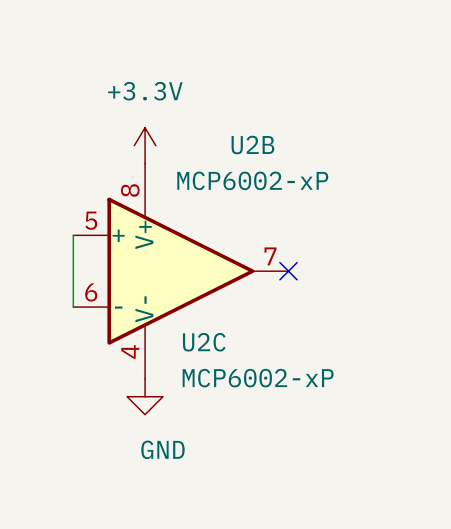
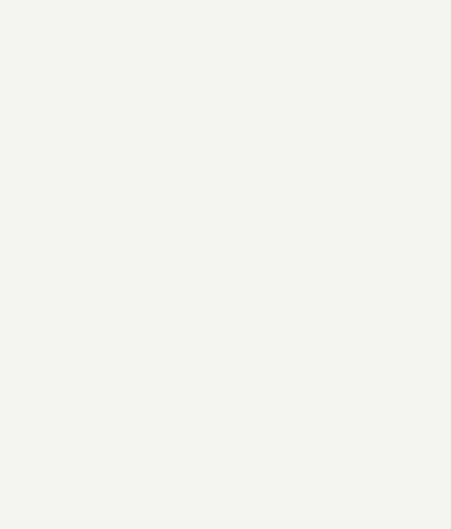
power symbol: +3.3V (145, 145) -> none
wire: (73, 235) (73, 307) -> none
U2C: MCP6002-xP (145, 271) -> none
U2B: MCP6002-xP (180, 271) -> none
no-connect mark: (288, 271) -> none
power symbol: GND (145, 396) -> none

